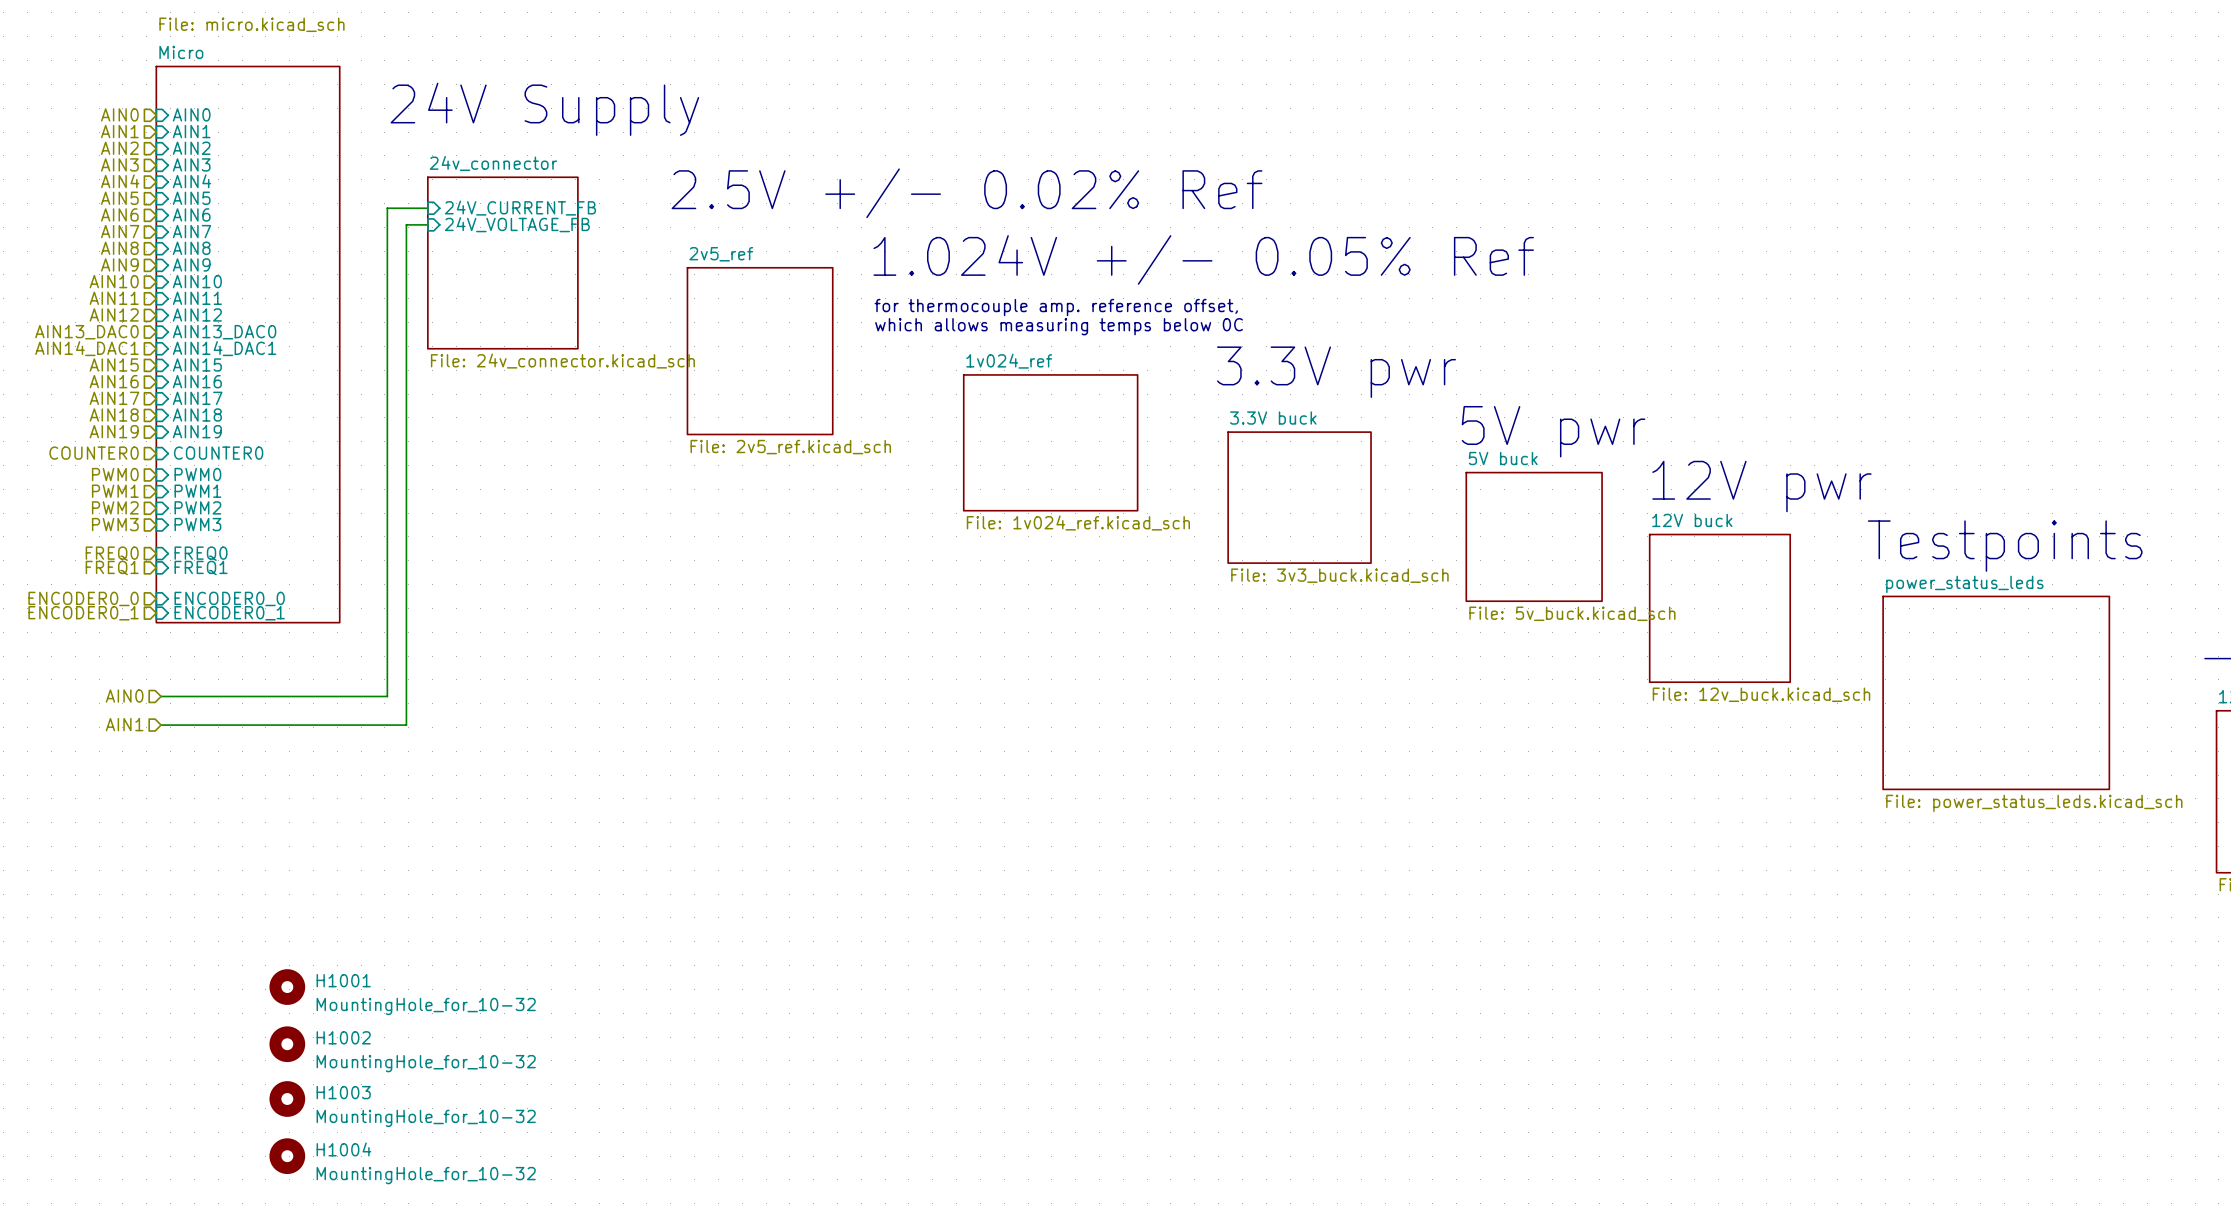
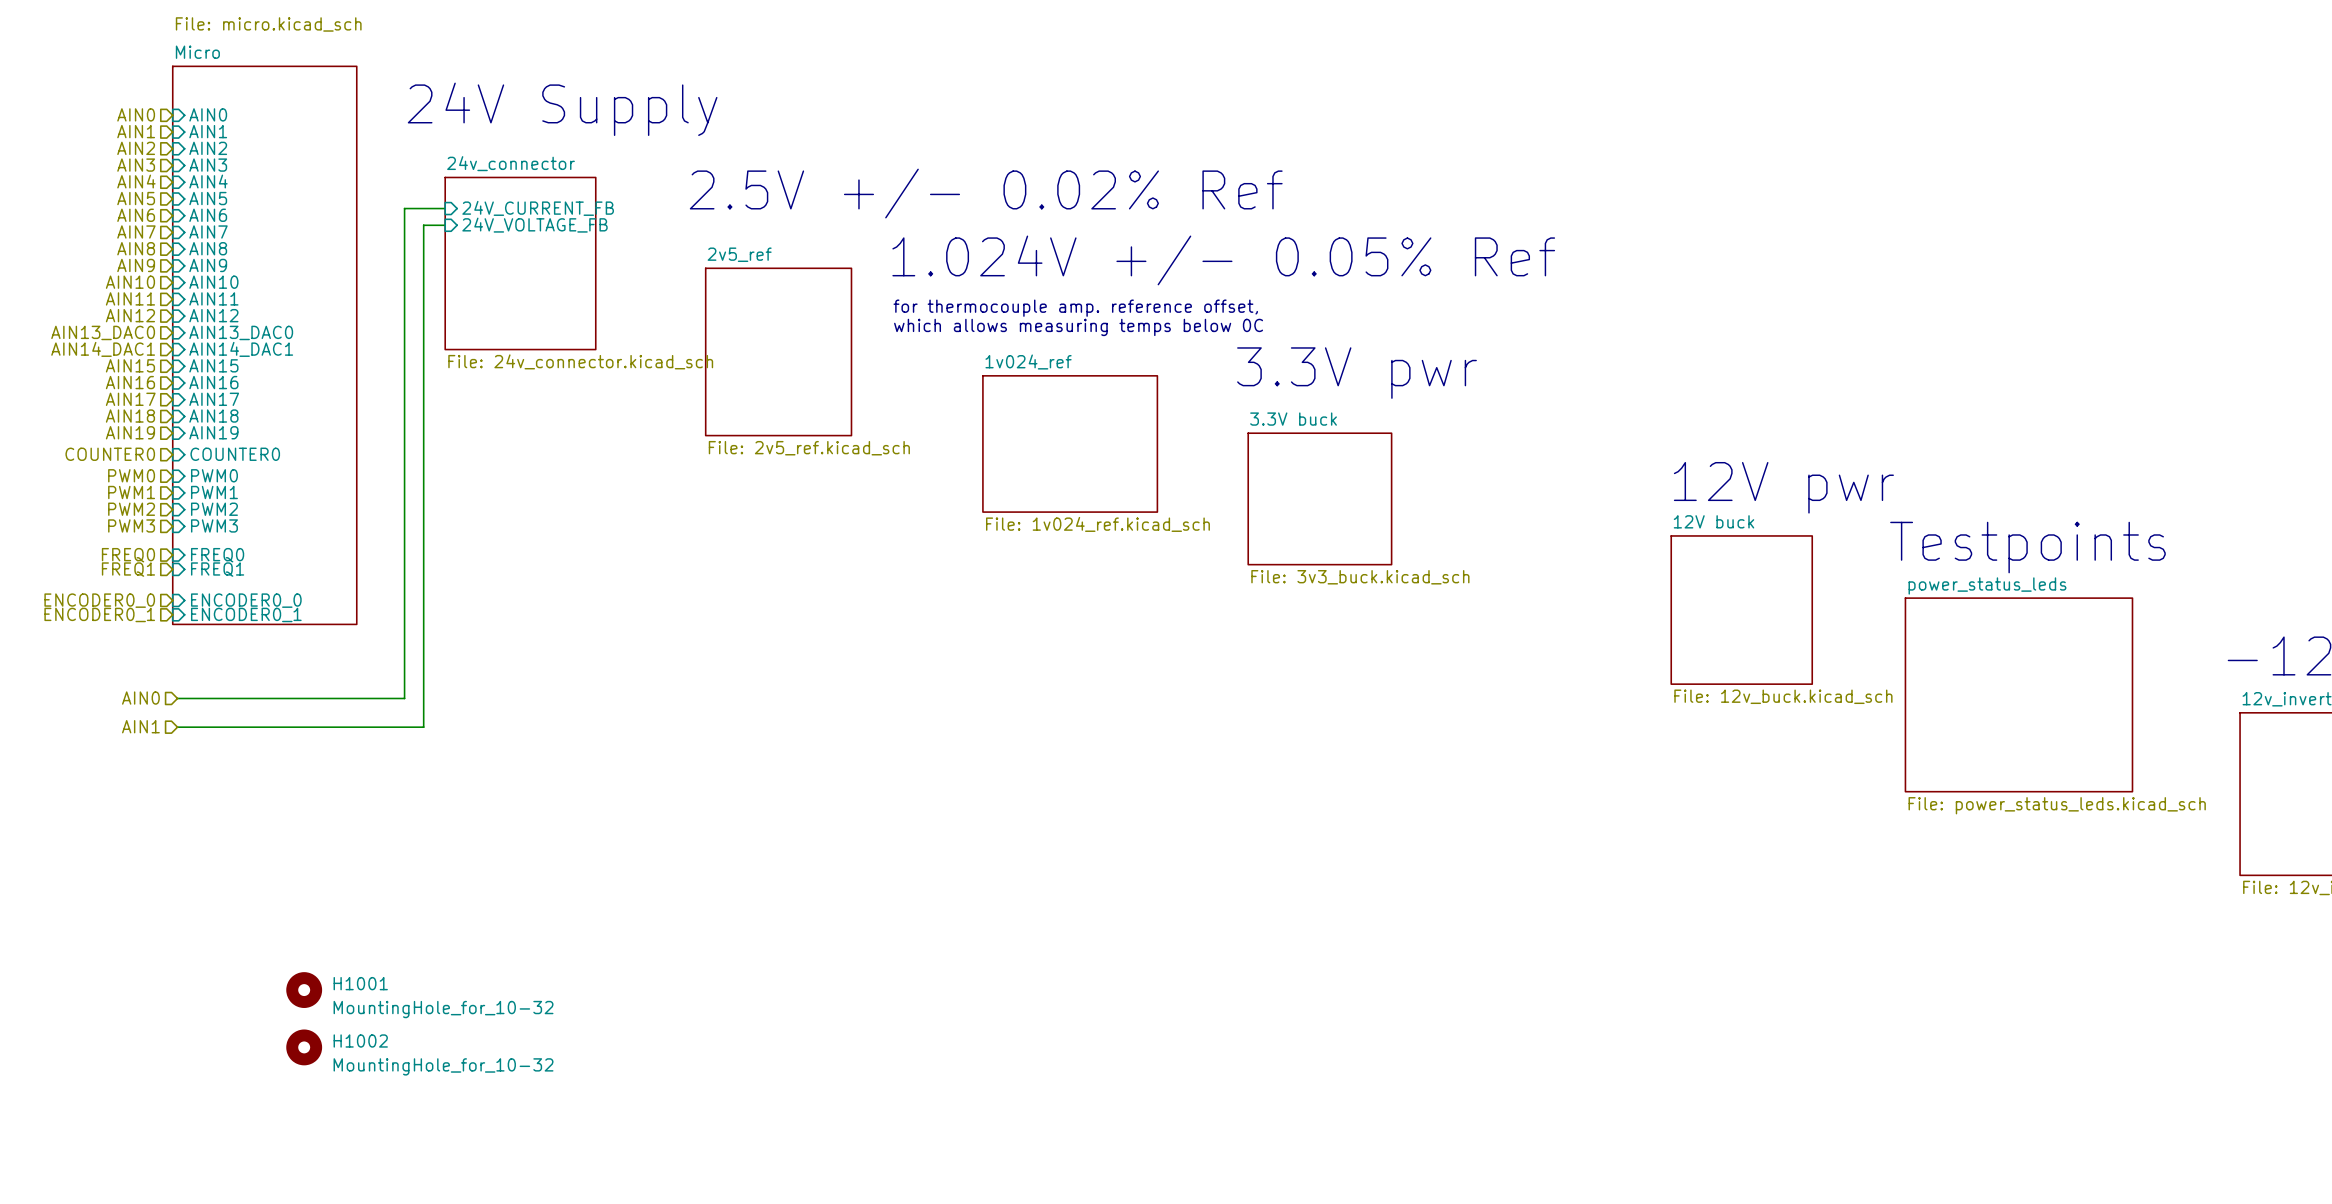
text: 5V pwr (1553, 431) -> none
sheet 5V buck: File: 5v_buck.kicad_sch (1534, 536) -> none
H1003: MountingHole_for_10-32 (287, 1099) -> none
H1004: MountingHole_for_10-32 (287, 1156) -> none

